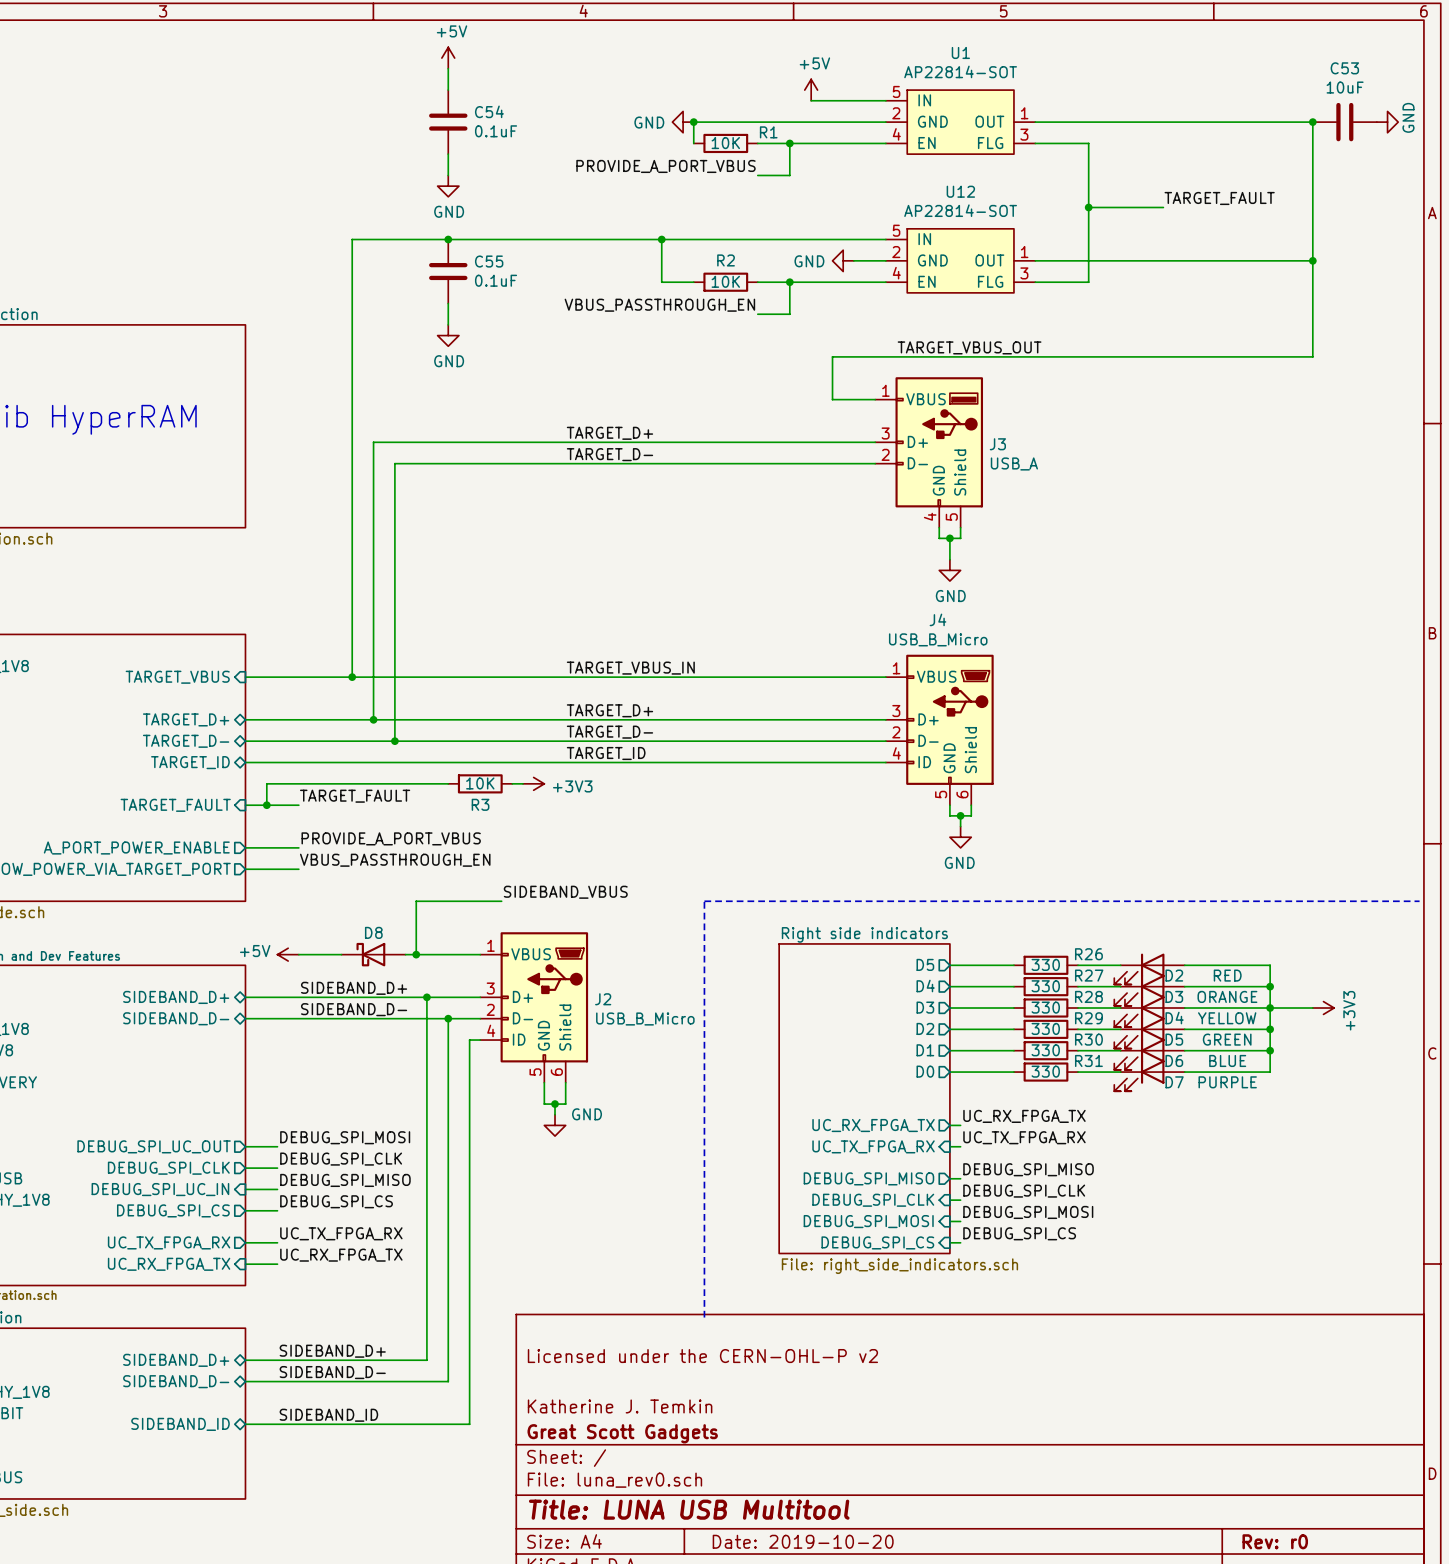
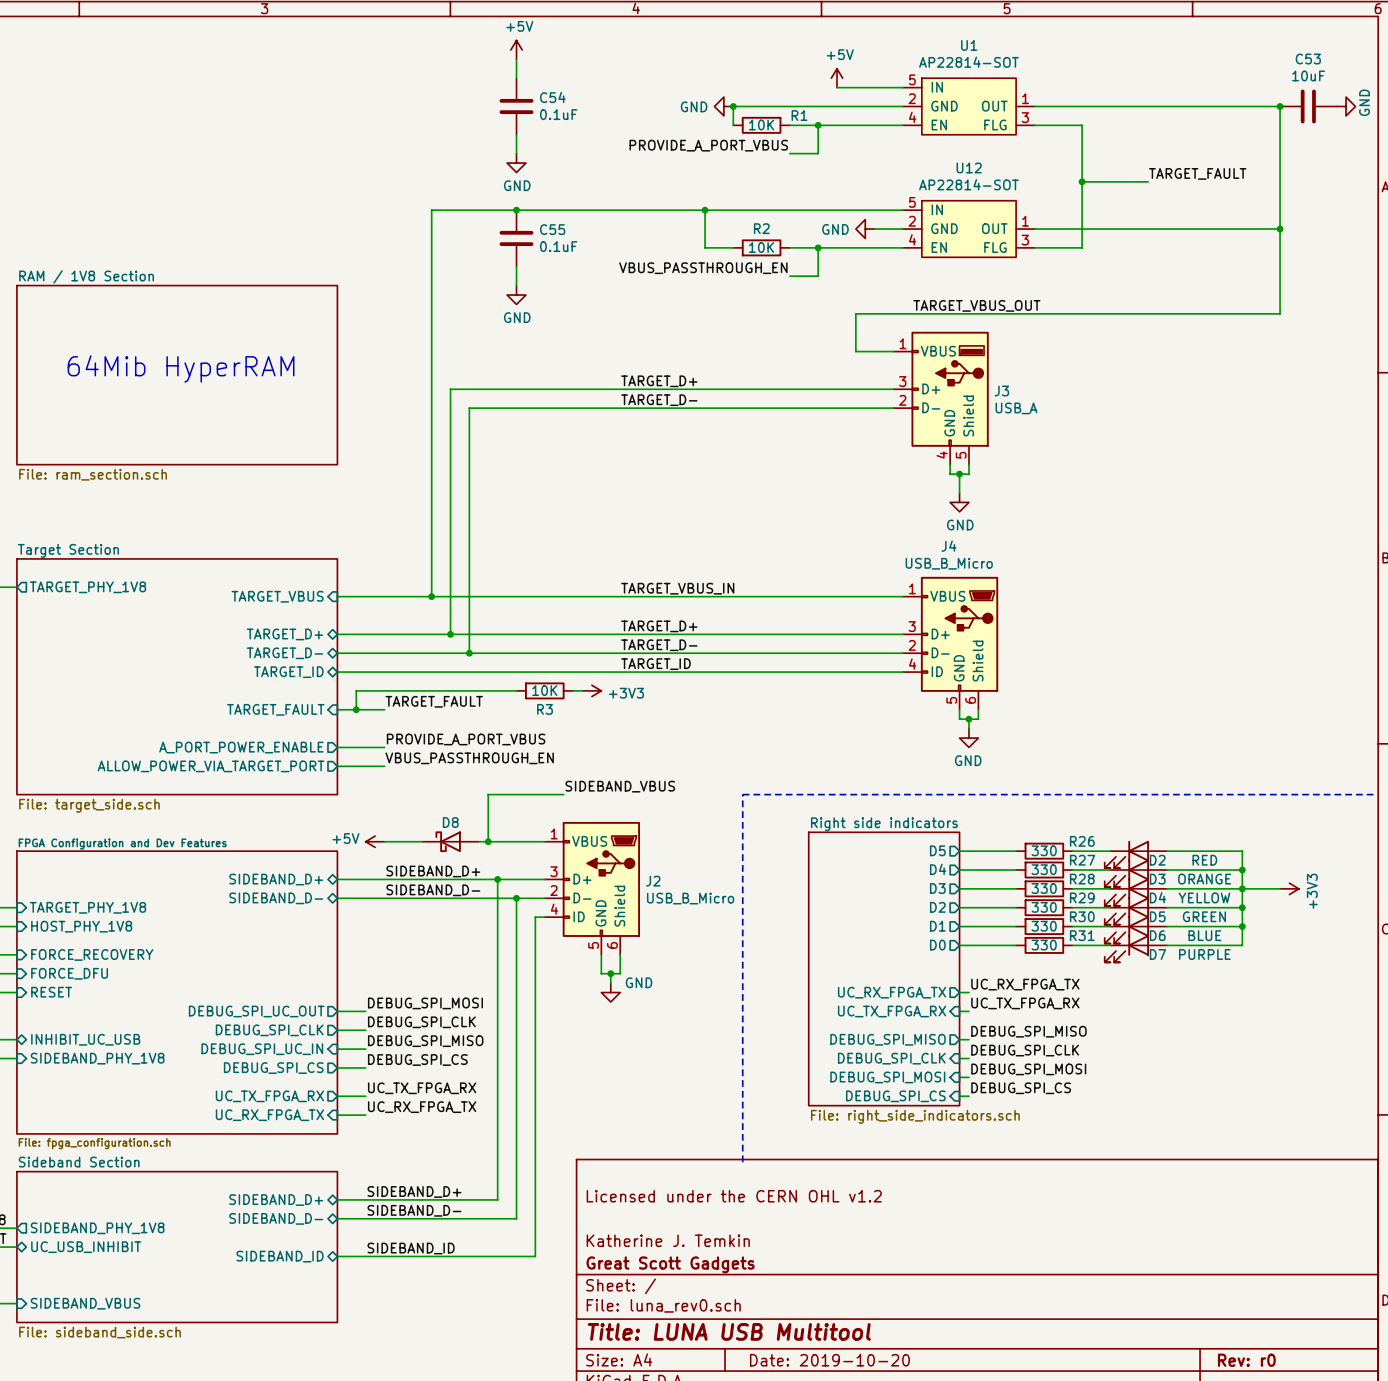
title block: Licensed under the CERN-OHL-P v2 (702, 1356) -> Licensed under the CERN OHL v1.2 (734, 1196)

